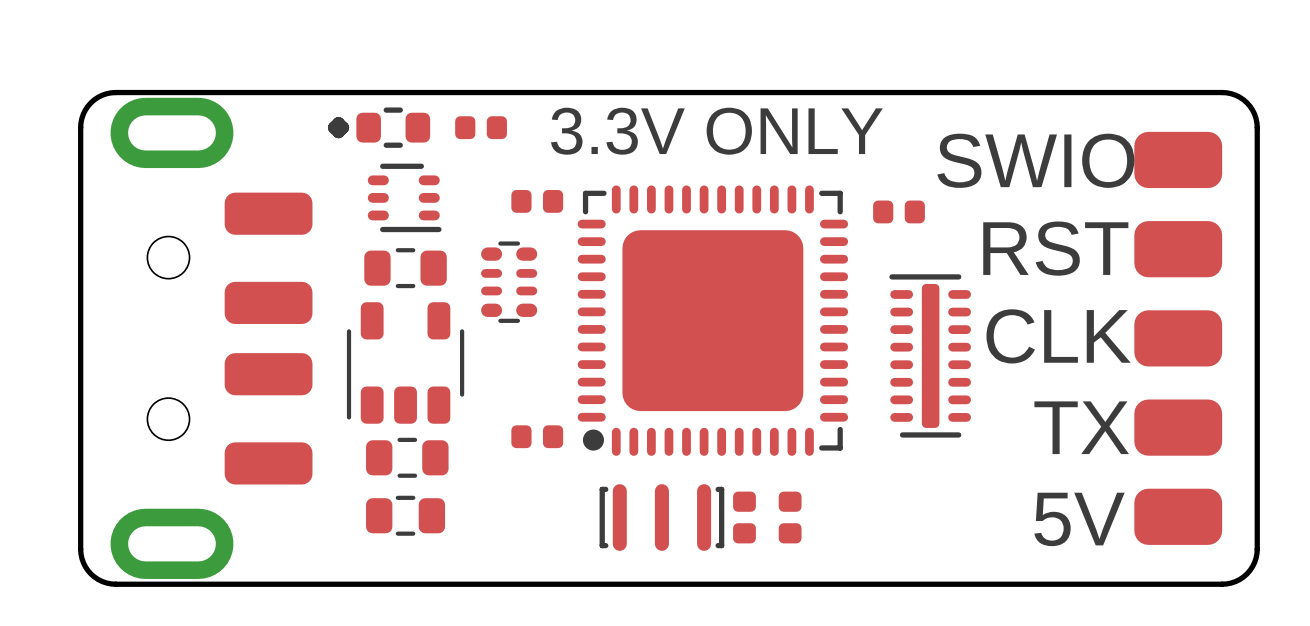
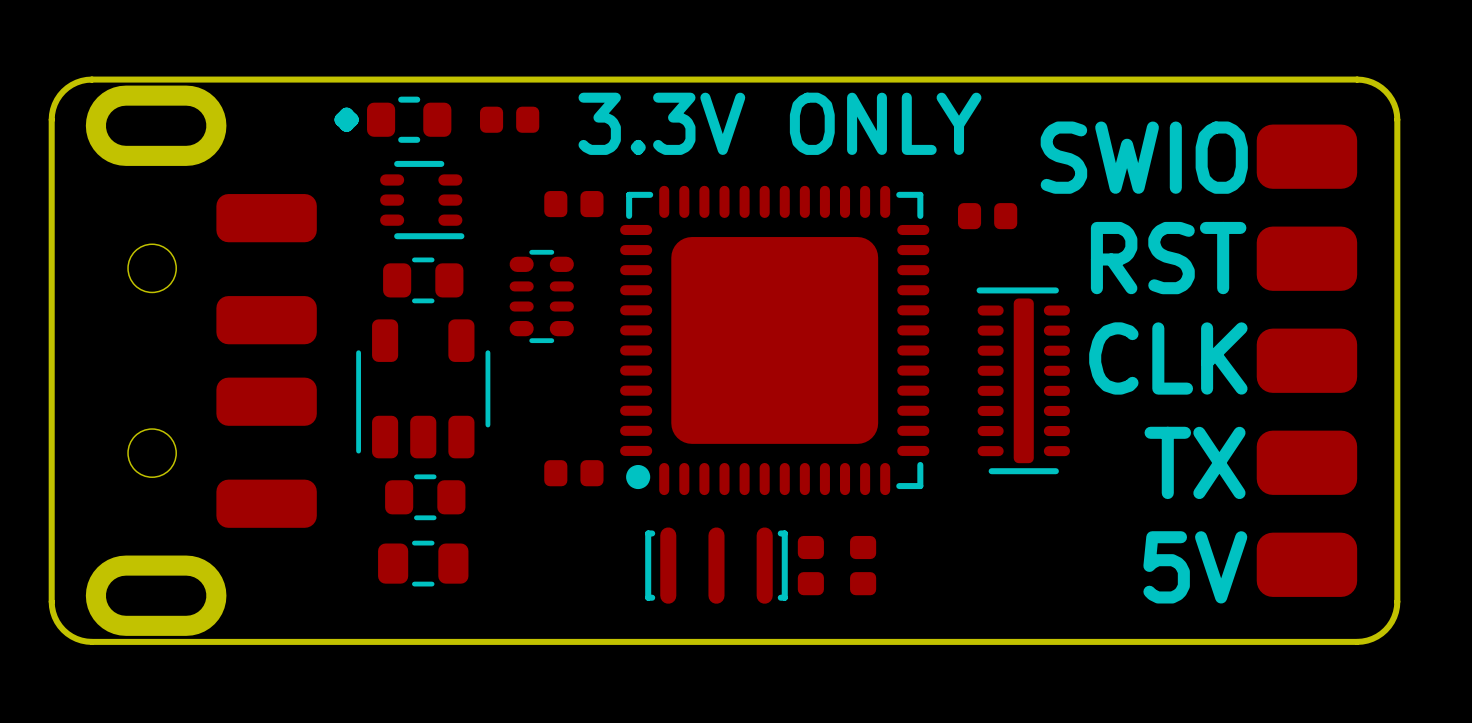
part footprint: [364, 248, 447, 289] -> [383, 257, 464, 304]
part footprint: [366, 437, 449, 478] -> [385, 474, 466, 521]

